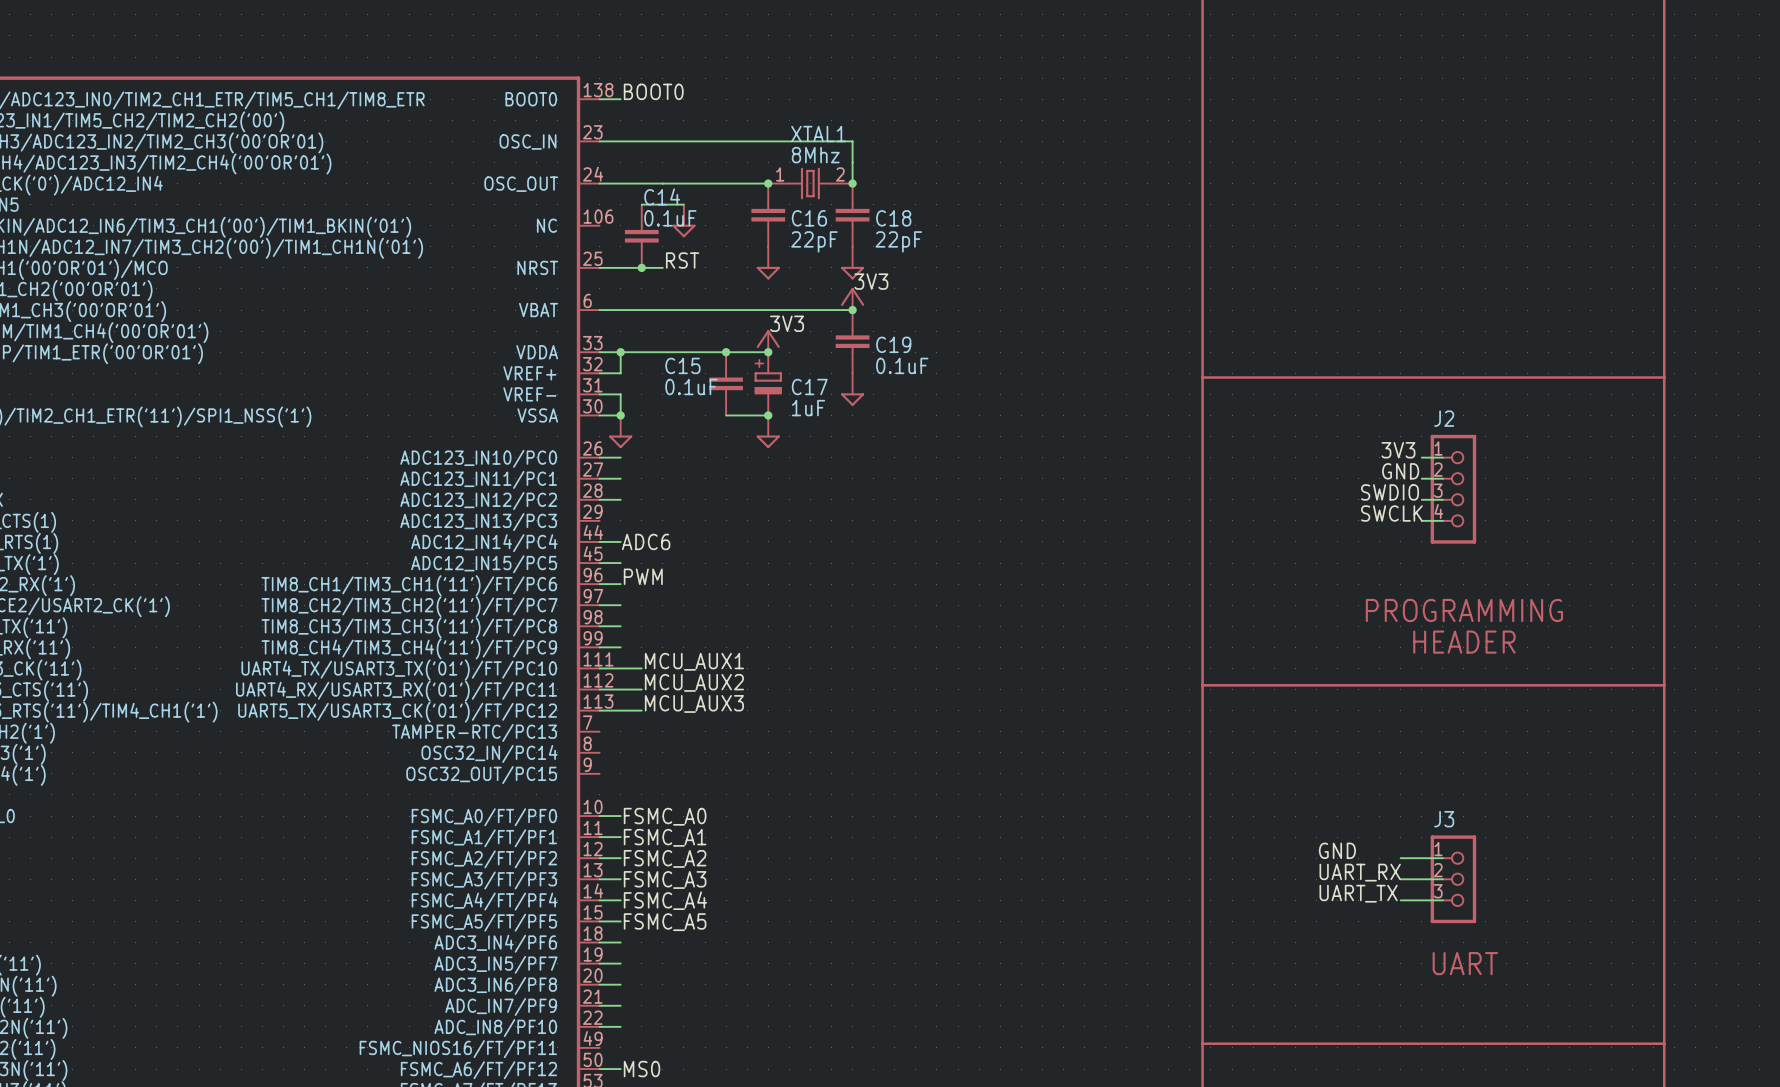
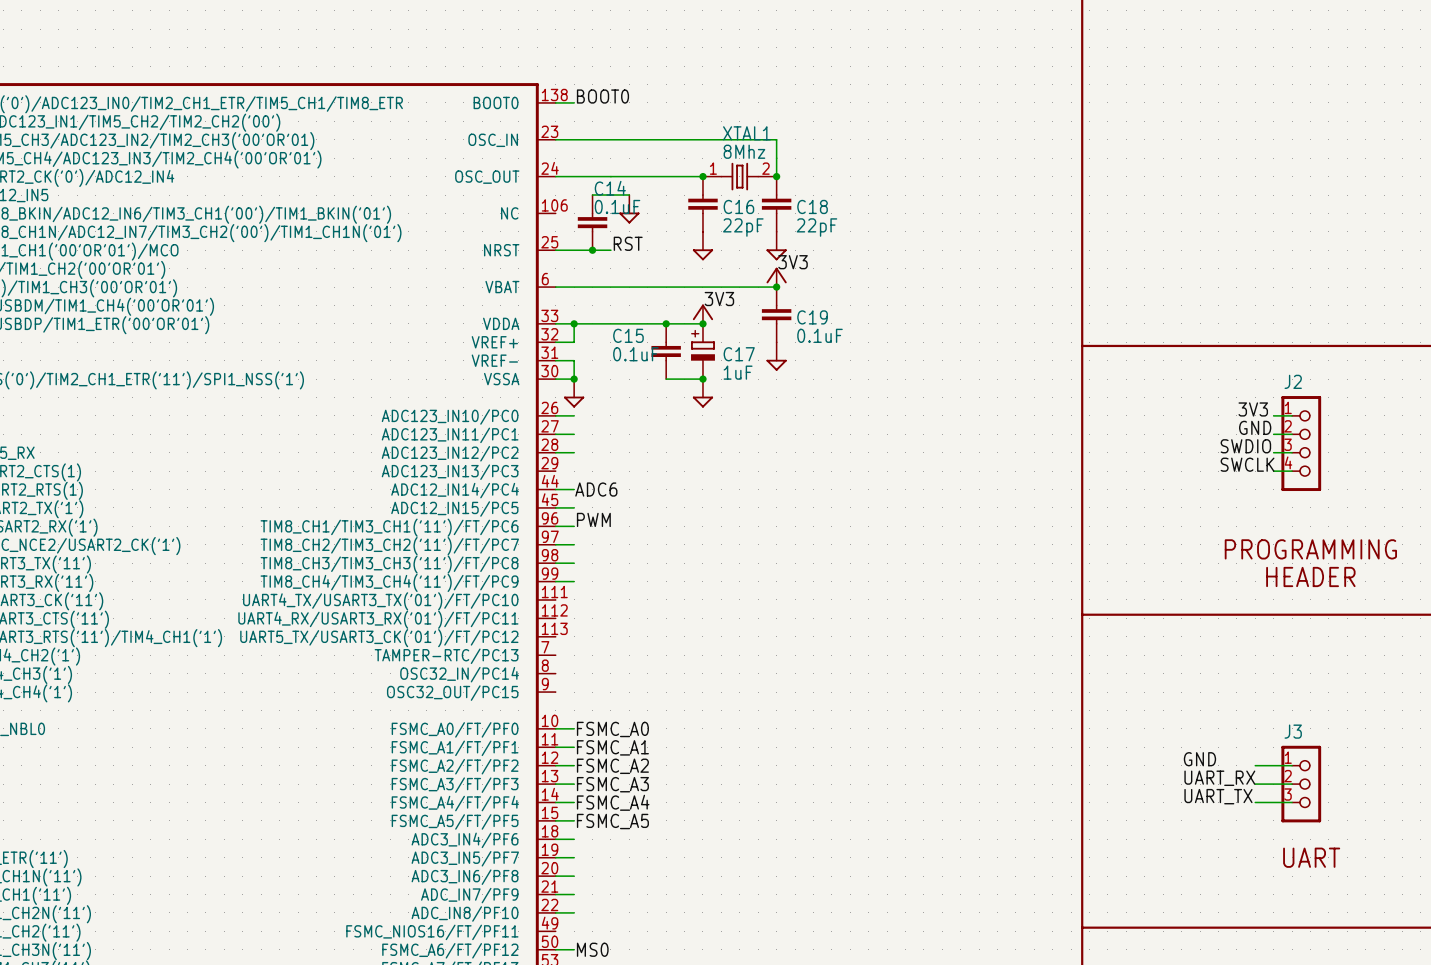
label: MCU_AUX1 (694, 661) -> none
wire: (599, 668) (641, 668) -> none
label: MCU_AUX2 (694, 682) -> none
wire: (599, 689) (641, 689) -> none
label: MCU_AUX3 (694, 703) -> none
wire: (599, 710) (641, 710) -> none

